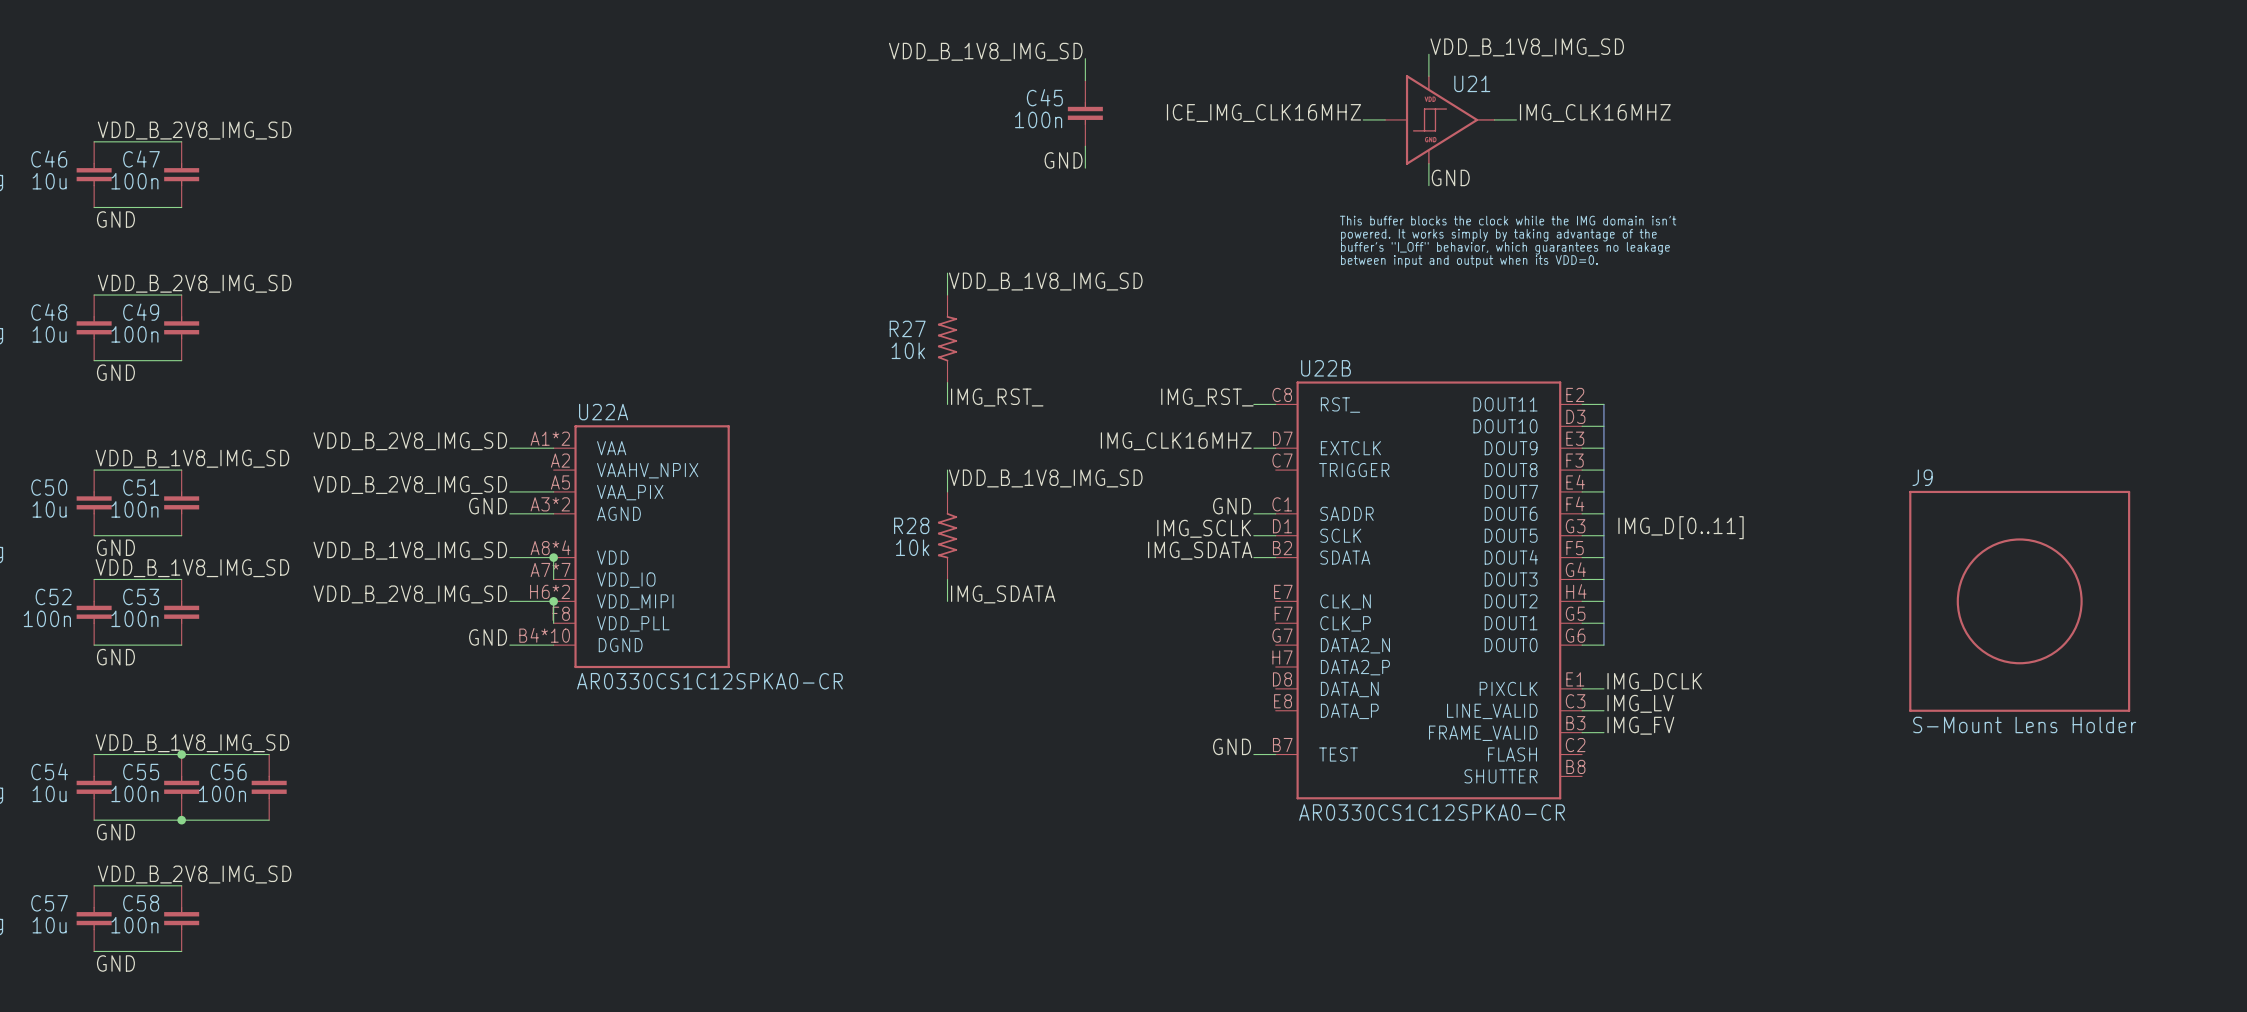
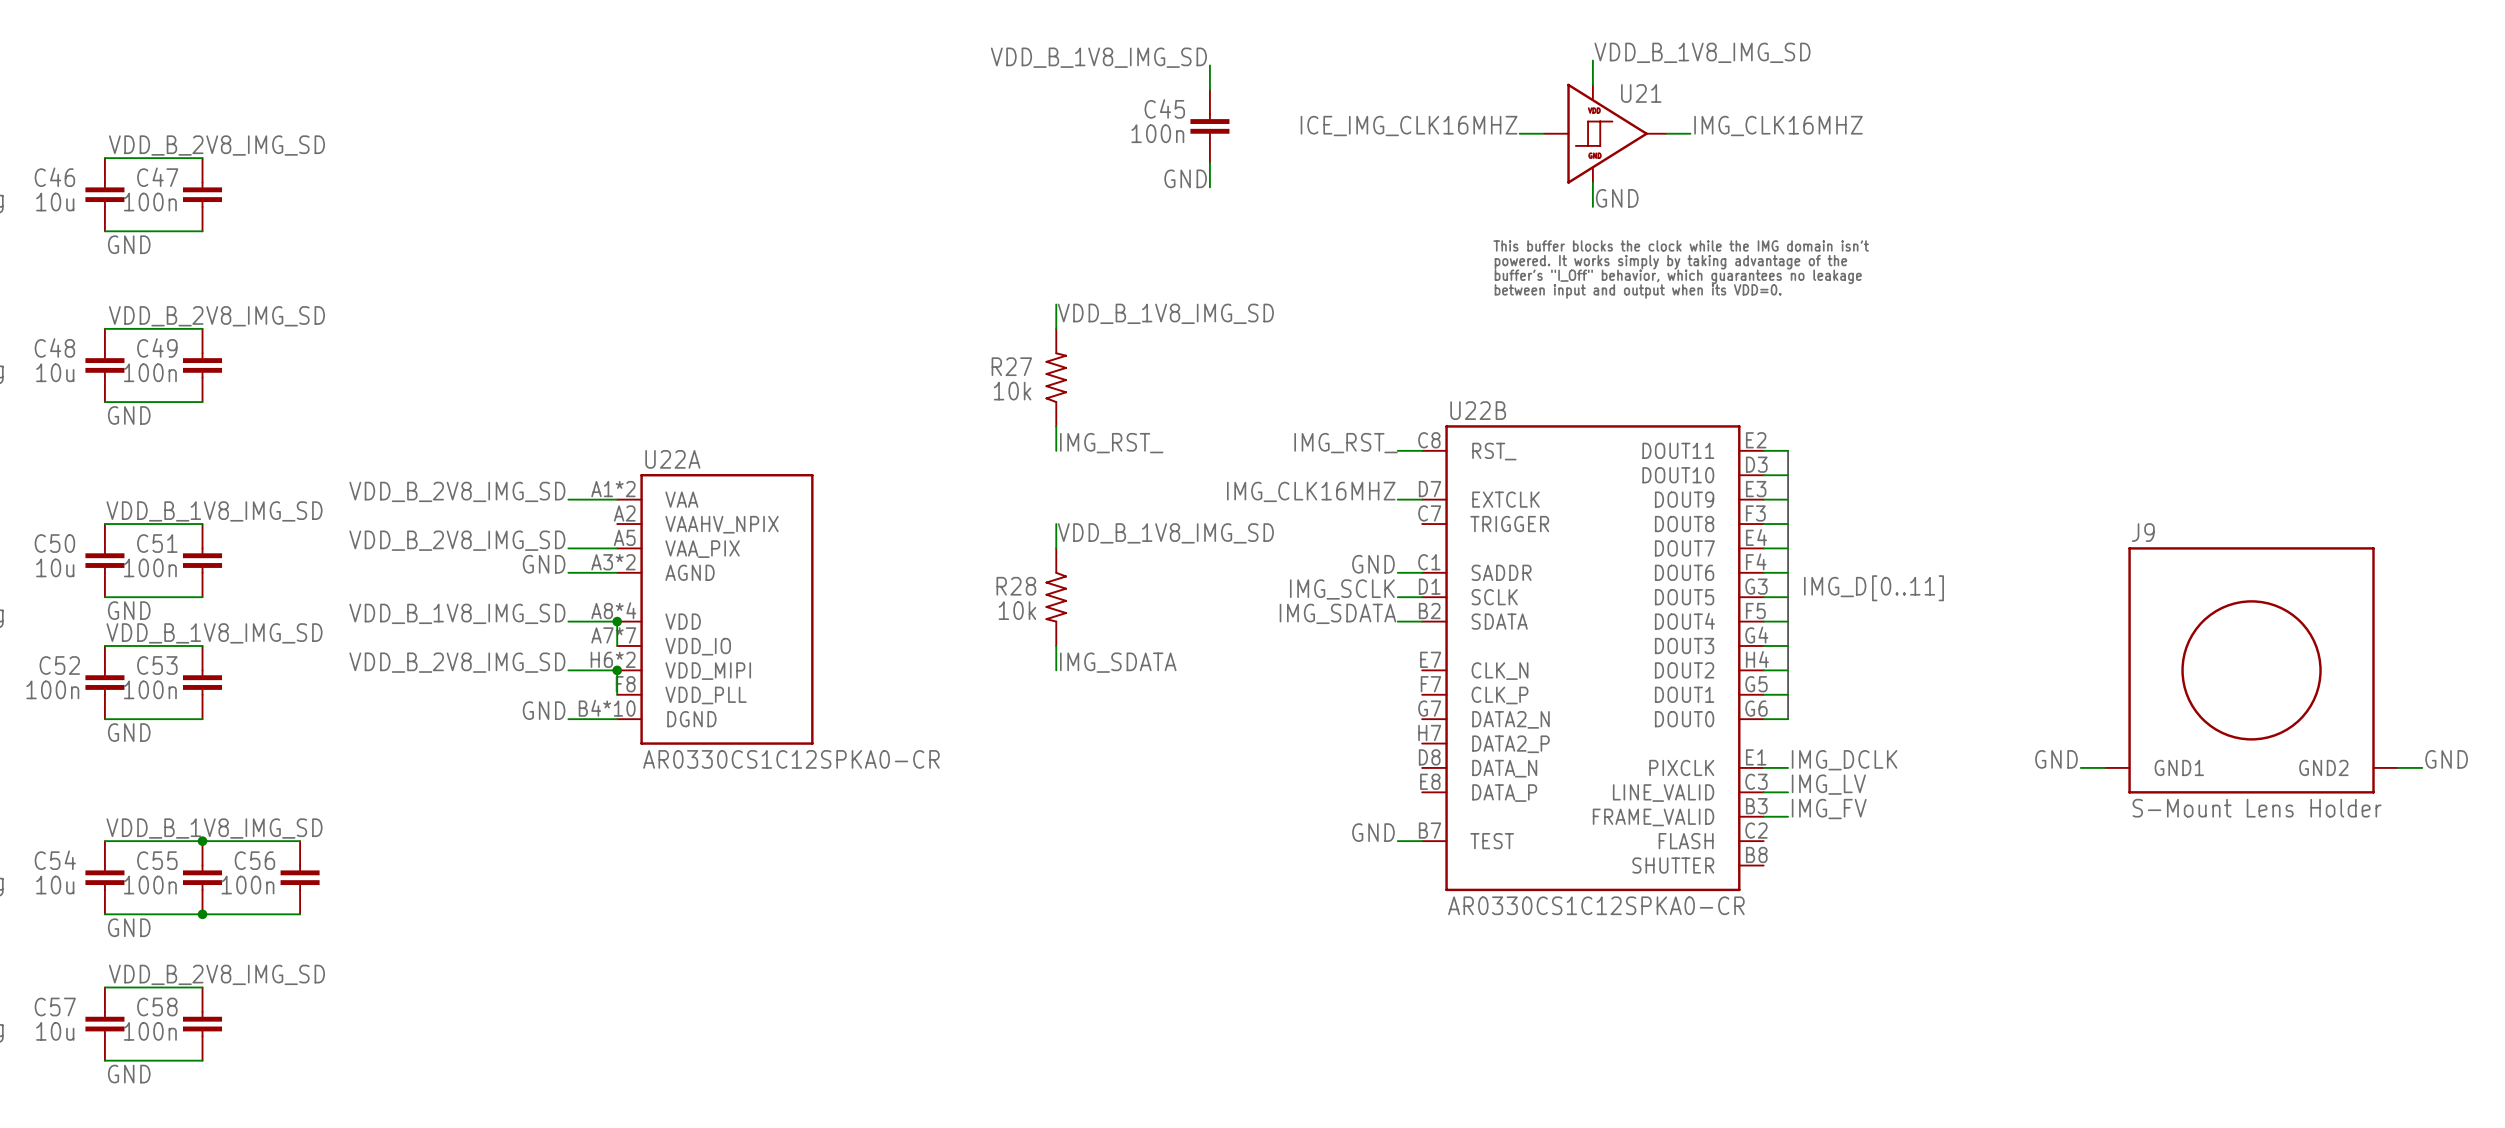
J9 symbol: [1909, 490, 2131, 712] -> [2105, 547, 2398, 794]
label: none -> GND (2056, 759)
label: none -> GND (2446, 759)
wire: none -> (2080, 767) (2105, 767)
wire: none -> (2397, 767) (2422, 767)

